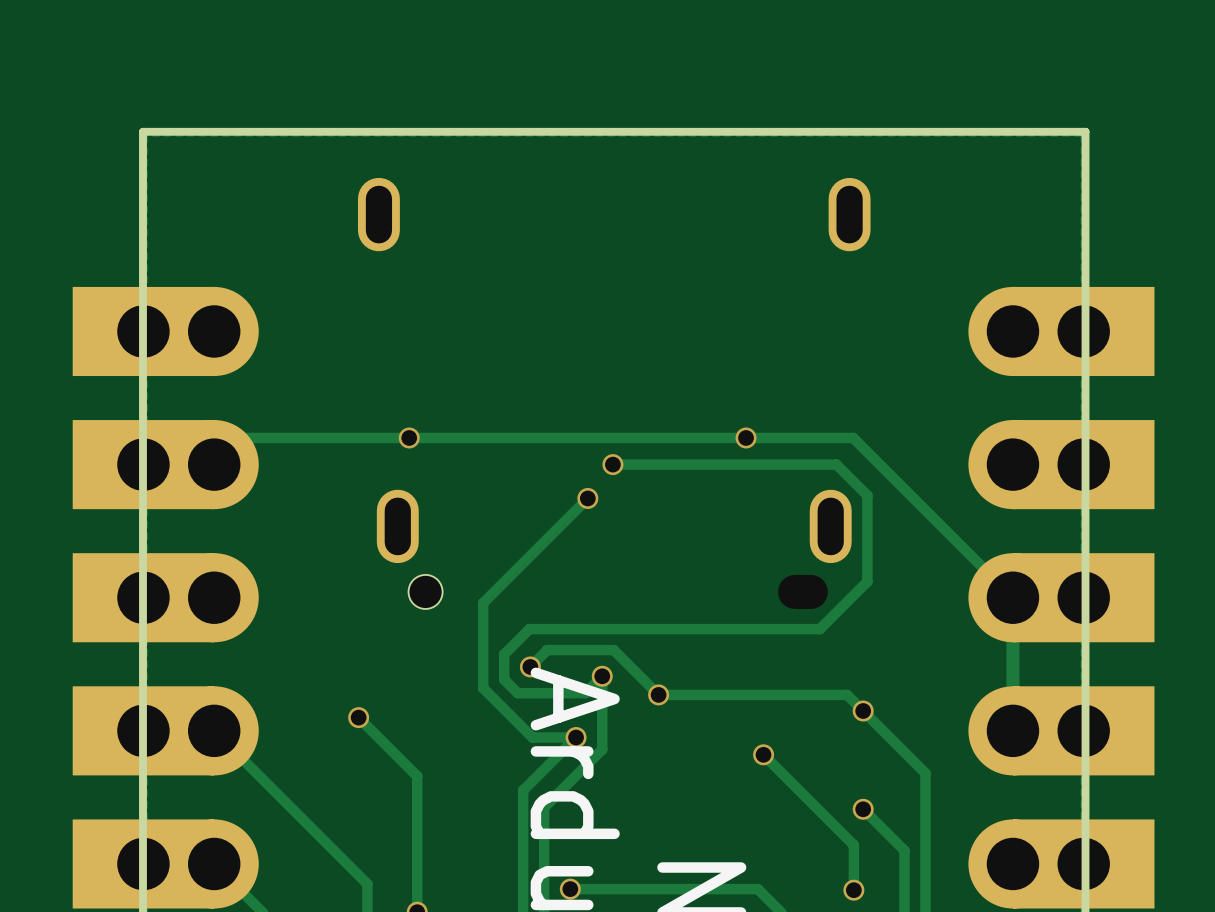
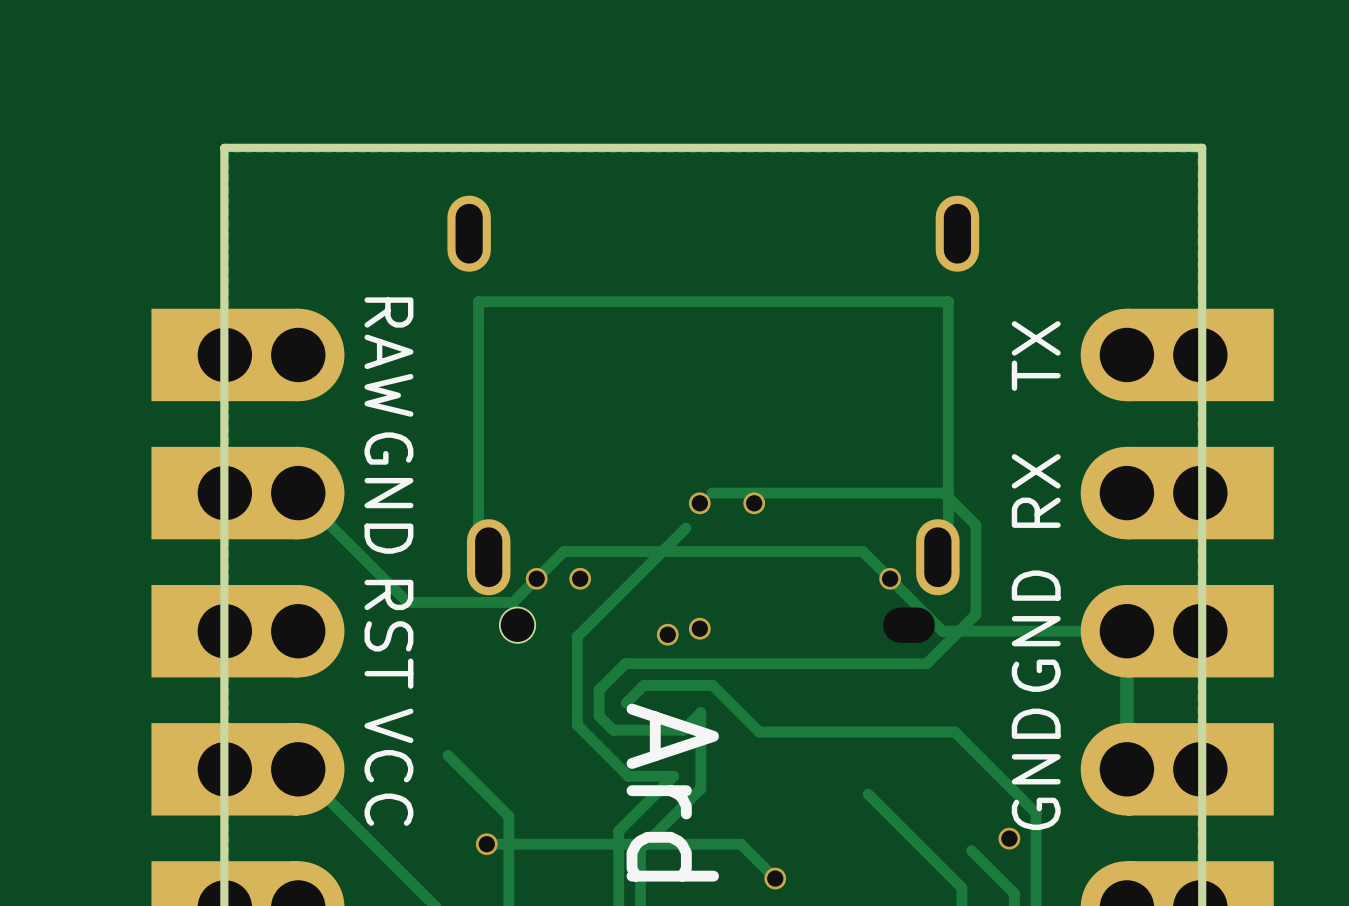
text: none -> TX (1036, 356)
text: none -> RAW (388, 357)
track: (240, 437) (853, 437) (1012, 597) -> (244, 493) (298, 493) (407, 602) (513, 602) (563, 551) (862, 551) (942, 631) (1126, 631)
via: (409, 437) -> none
via: (746, 437) -> none
text: none -> RX (1036, 491)
text: none -> GND (388, 493)
via position: (612, 464) -> (699, 503)
via: none -> (754, 503)
via: (587, 498) -> none
track: none -> (948, 529) (948, 301) (478, 301) (478, 529)
via: none -> (536, 578)
via: none -> (580, 578)
via: none -> (890, 578)
via: none -> (699, 628)
text: none -> GND (1036, 631)
text: none -> RST (388, 634)
via: none -> (667, 634)
via: (530, 666) -> none
via: (602, 676) -> none
via: (658, 694) -> none
via: (863, 711) -> none
via position: (358, 717) -> (486, 844)
text: none -> VCC (388, 767)
text: none -> GND (1036, 769)
via: (576, 737) -> none
via: (763, 754) -> none
track: none -> (486, 844) (740, 844) (775, 878)
via position: (863, 809) -> (1009, 838)
via: none -> (775, 878)

